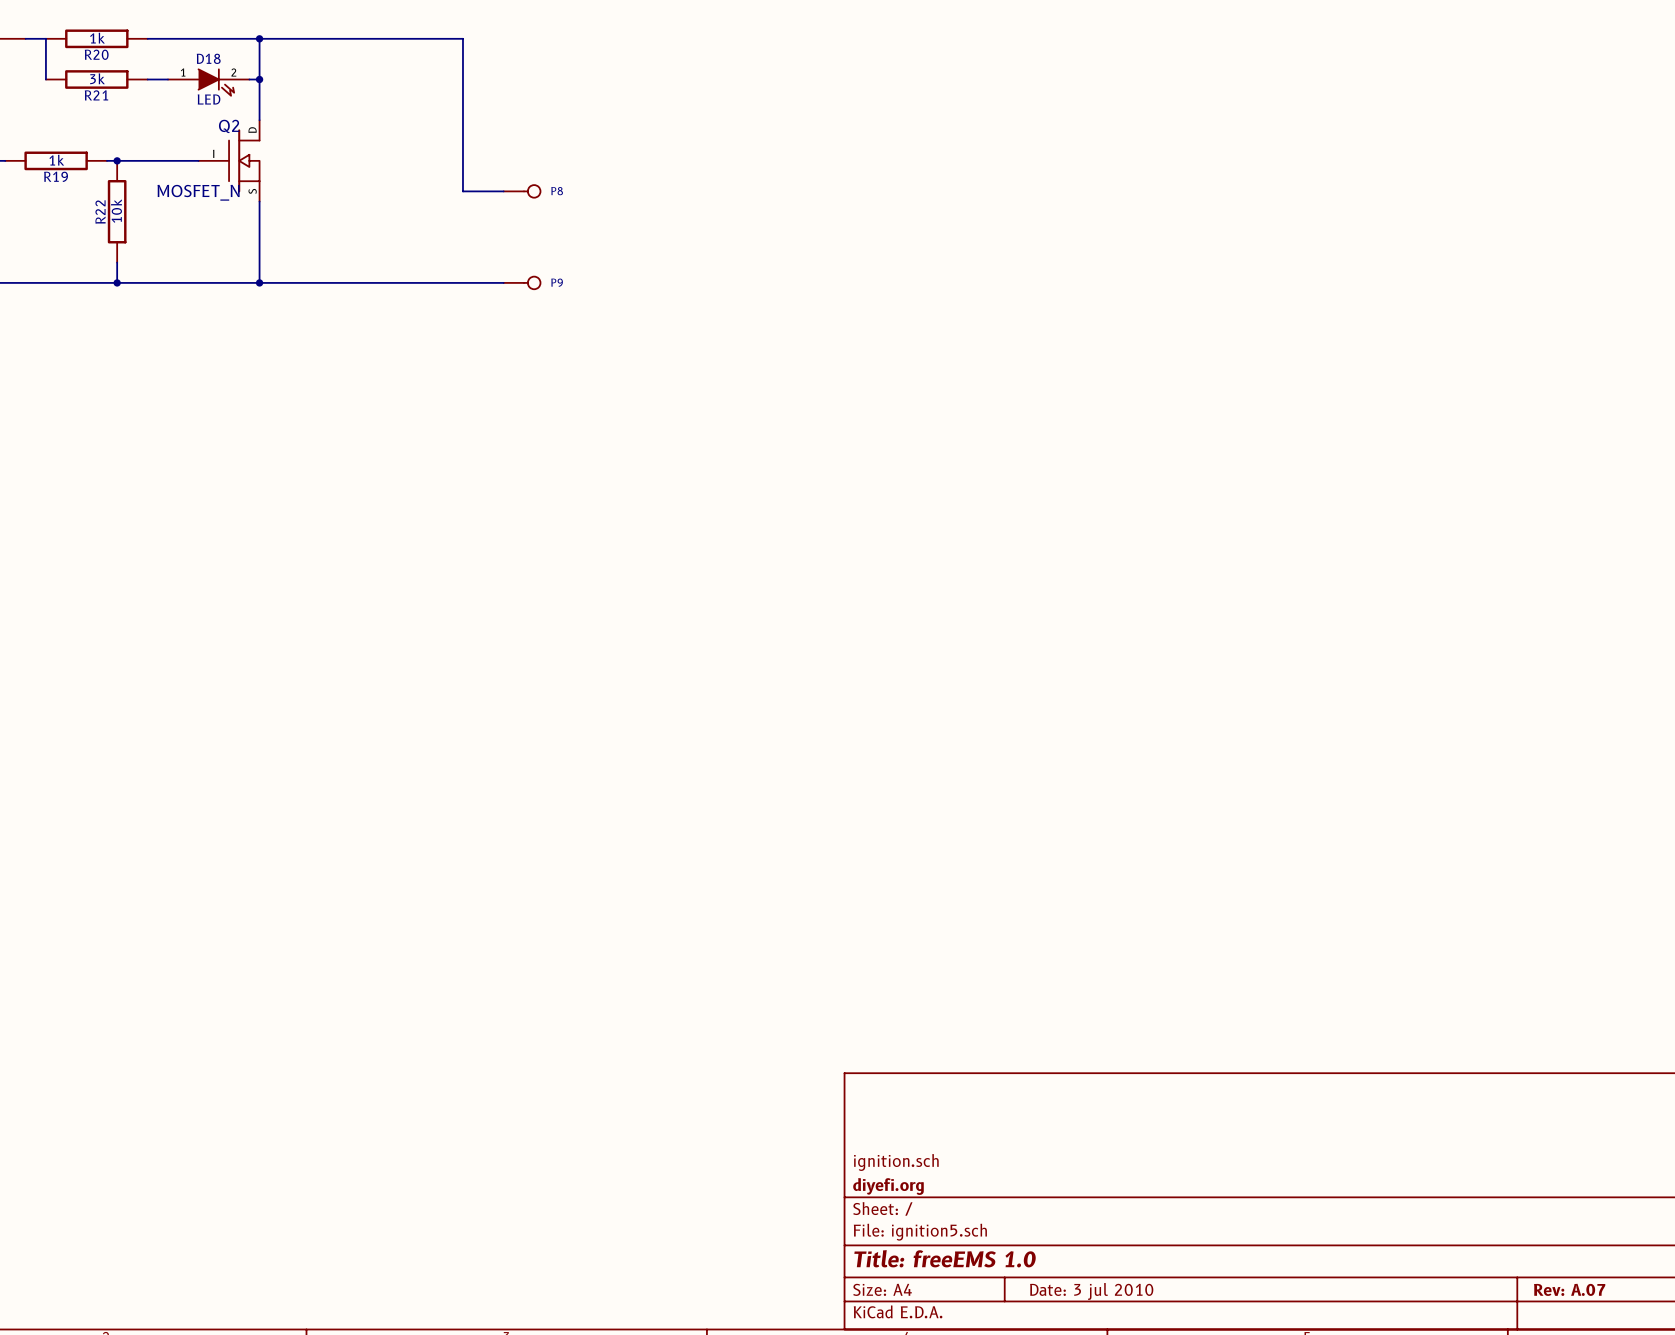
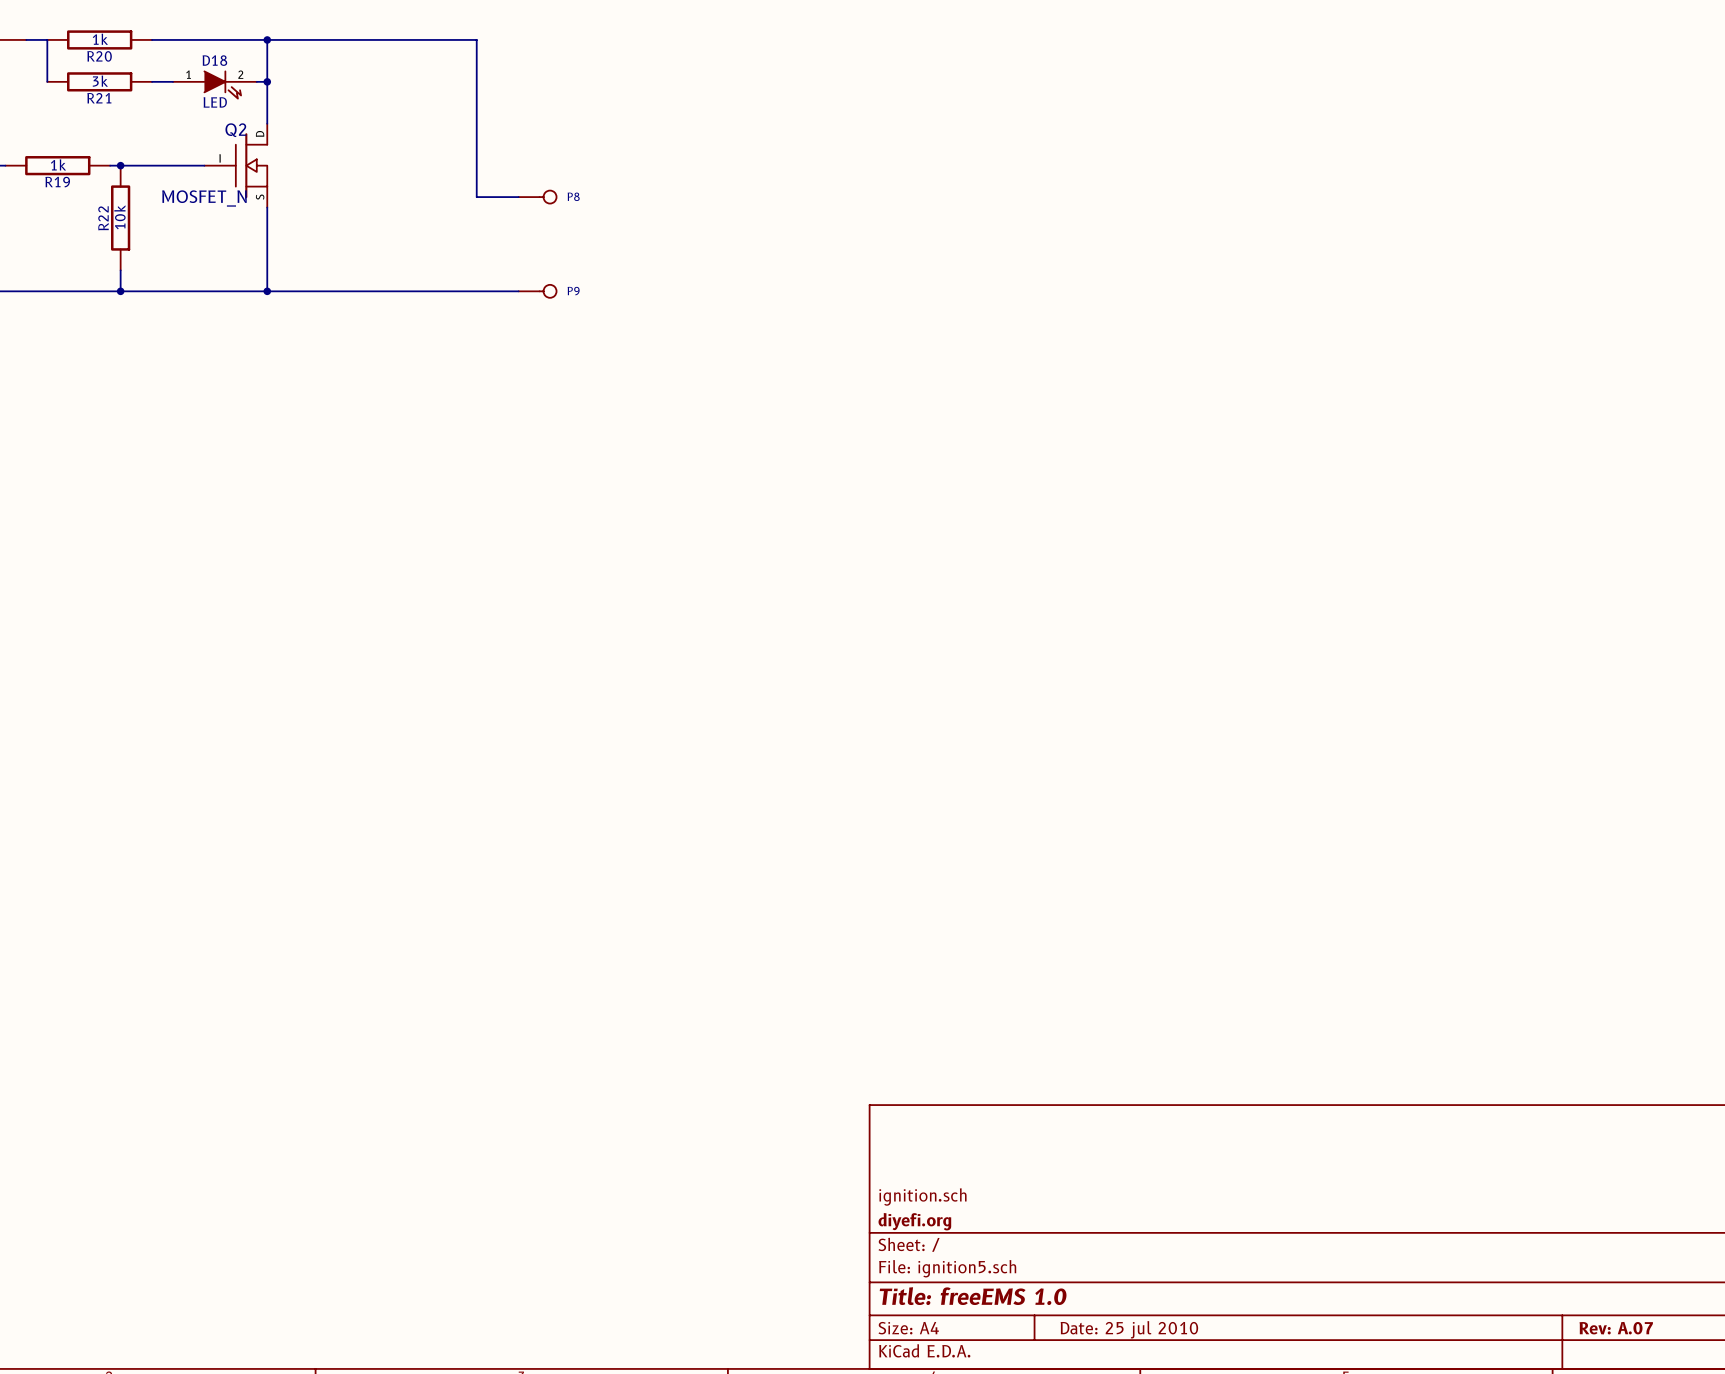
title block: Date: 3 jul 2010 (1091, 1291) -> Date: 25 jul 2010 (1129, 1329)

